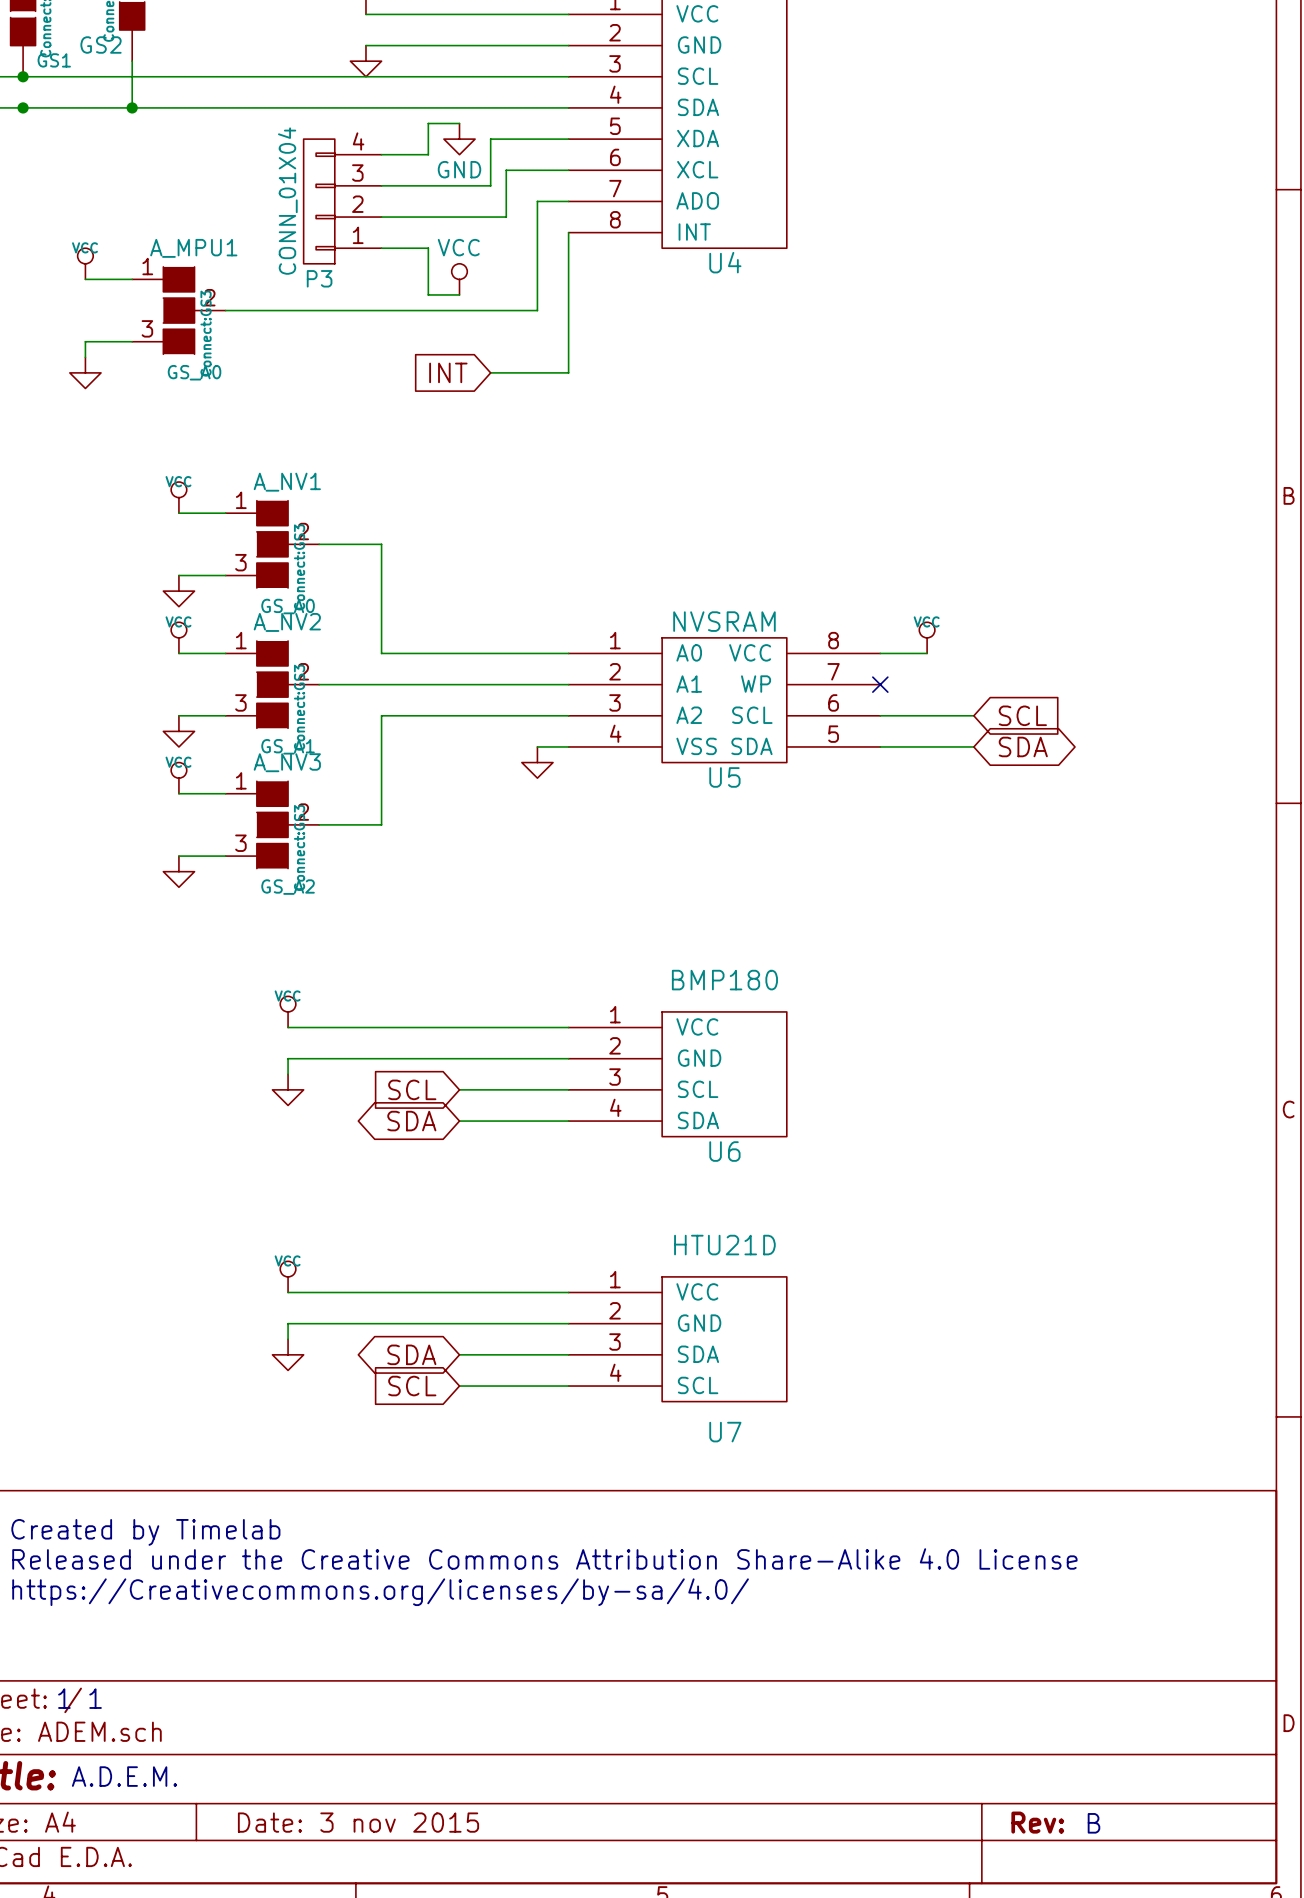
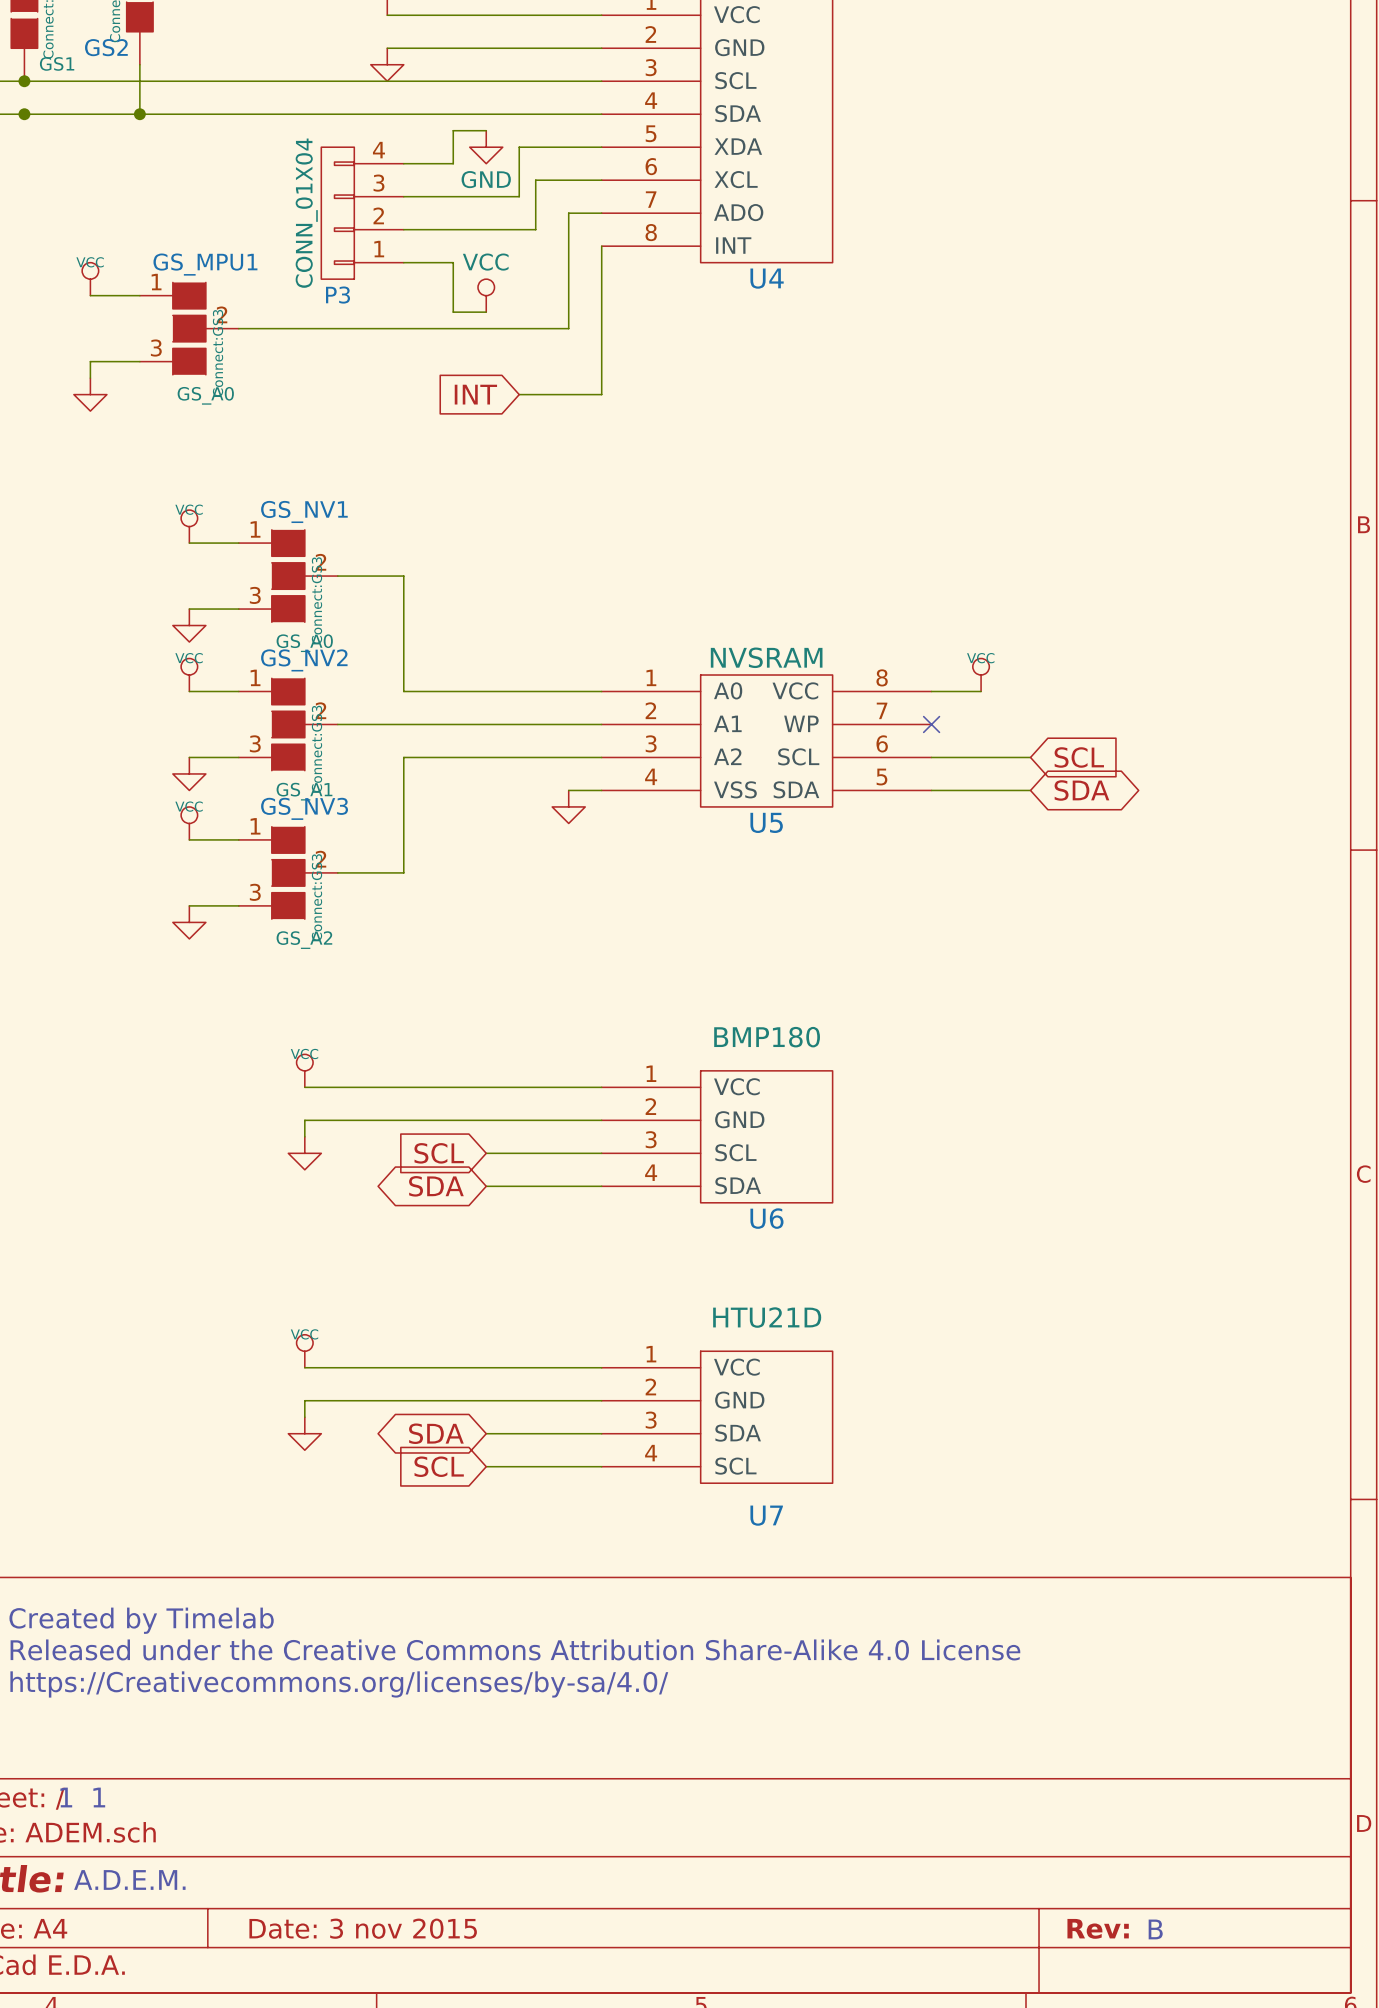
A_MPU1 name: A_MPU1 (193, 248) -> GS_MPU1 (205, 264)
A_NV1 name: A_NV1 (287, 482) -> GS_NV1 (304, 511)
A_NV2 name: A_NV2 (287, 622) -> GS_NV2 (304, 660)
A_NV3 name: A_NV3 (287, 762) -> GS_NV3 (304, 808)

